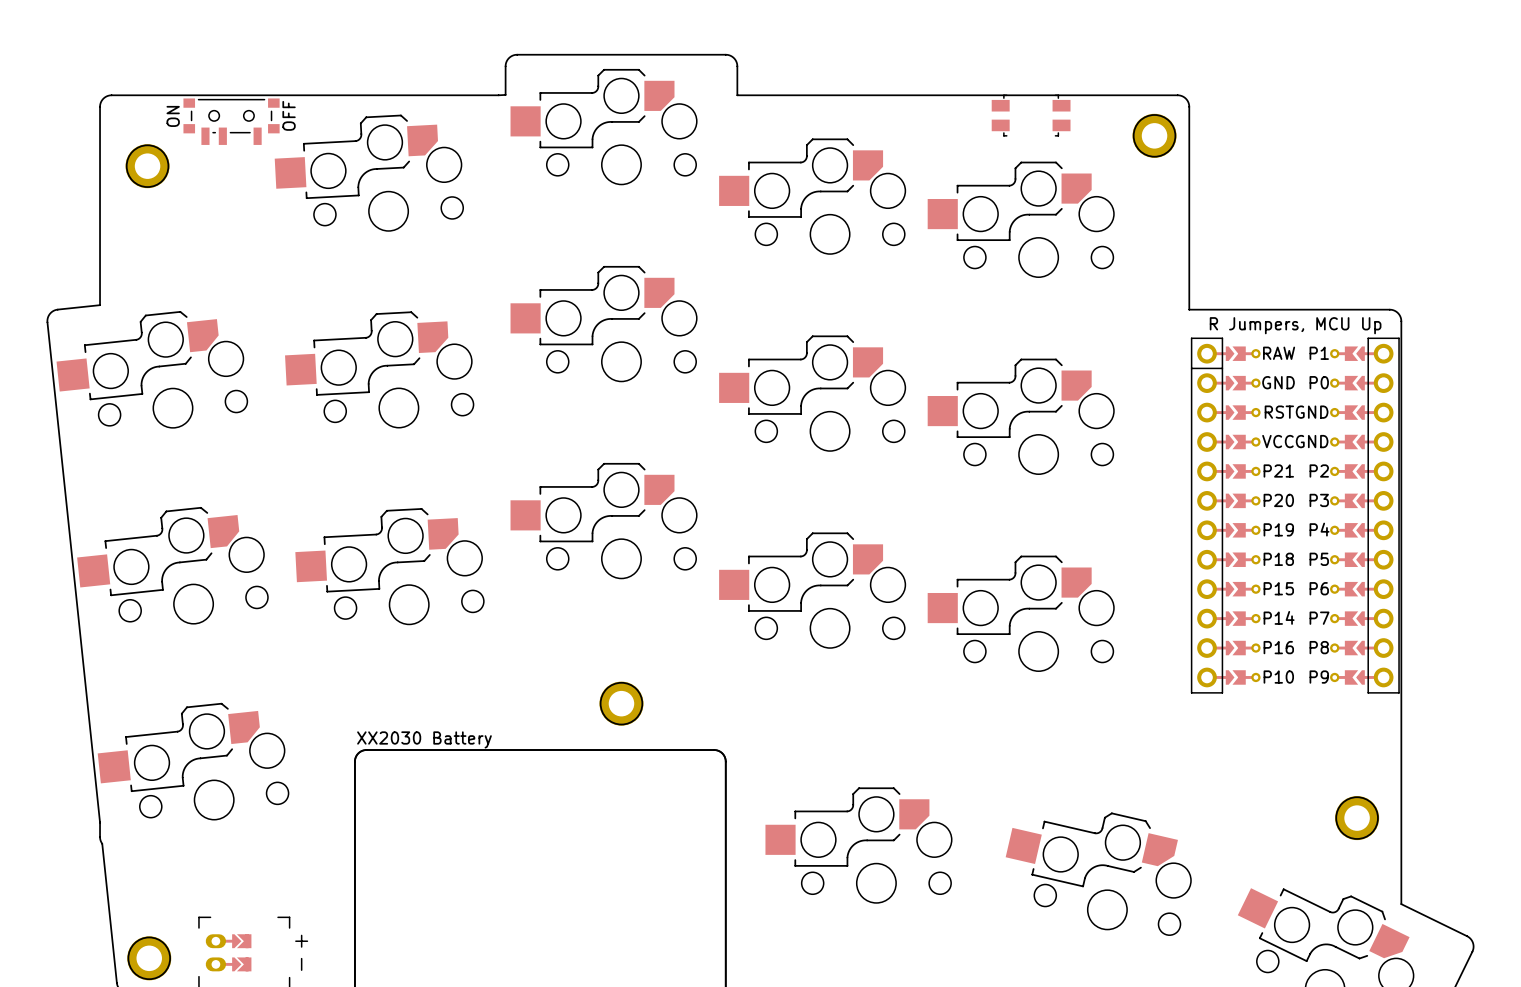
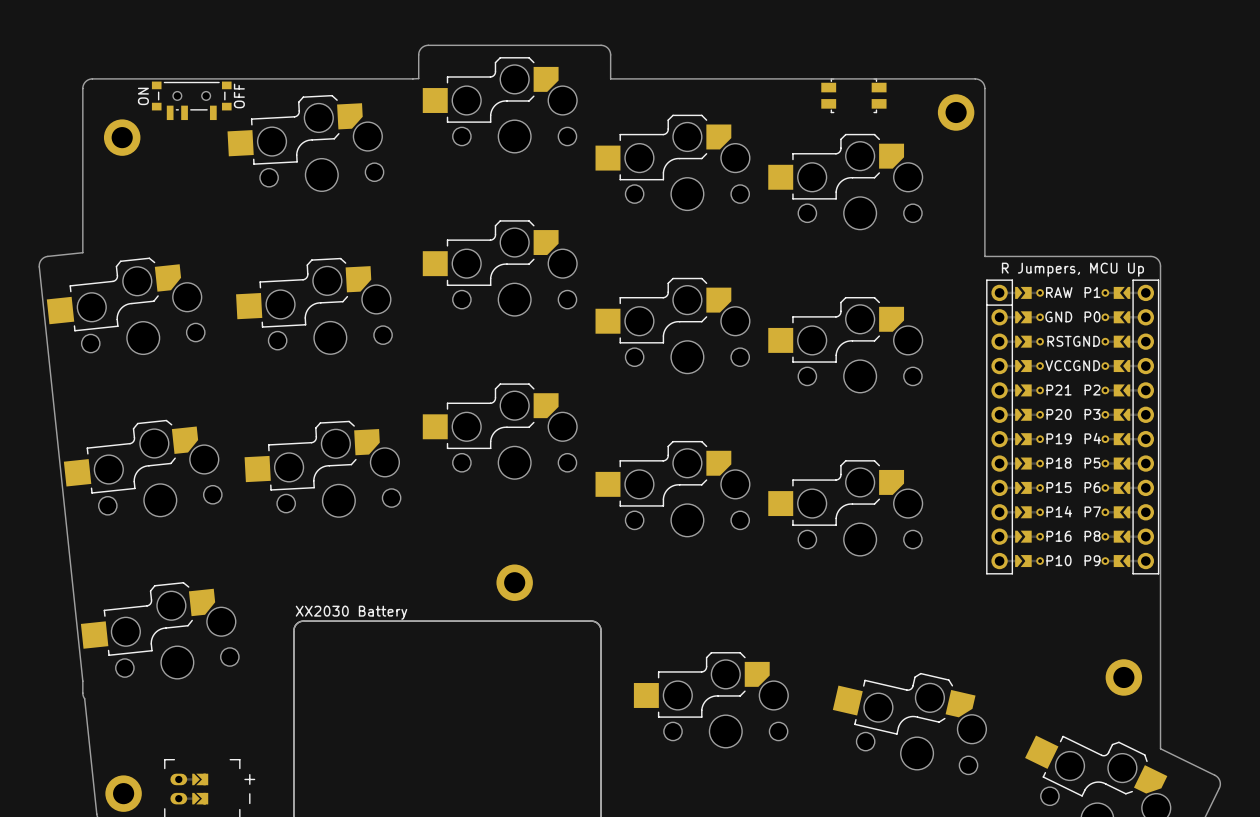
round board edge: [1132, 114, 1177, 158] -> none
round board edge: [125, 144, 170, 188] -> none
round board edge: [599, 681, 644, 726] -> none
round board edge: [1335, 796, 1379, 840] -> none
round board edge: [127, 936, 171, 981] -> none

